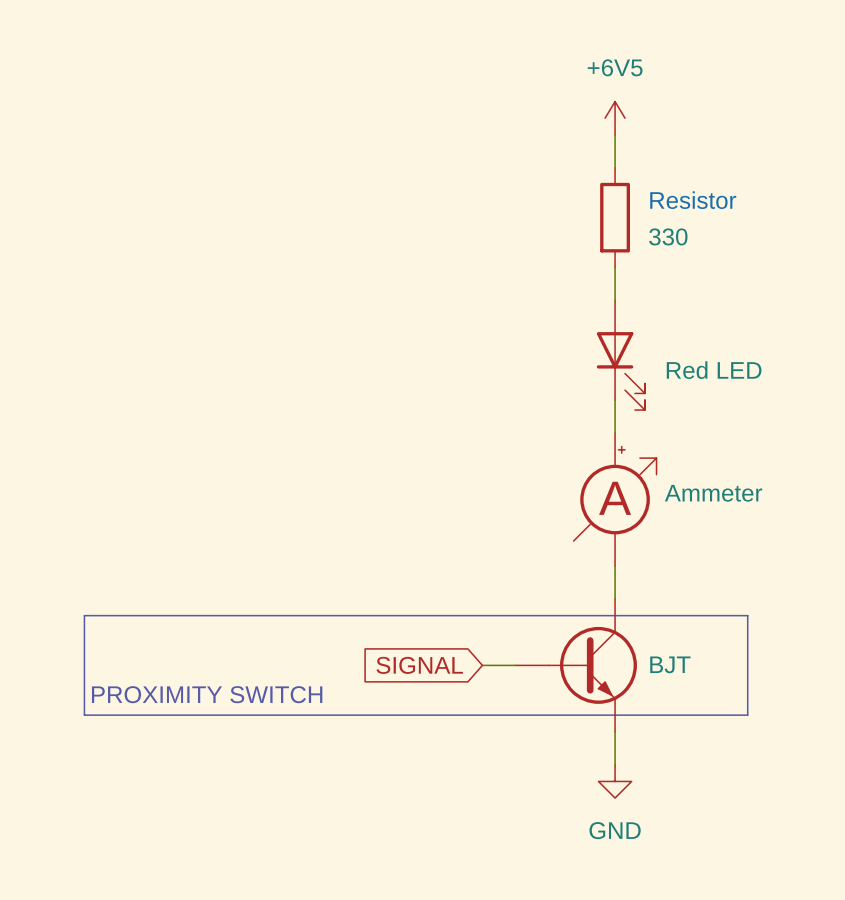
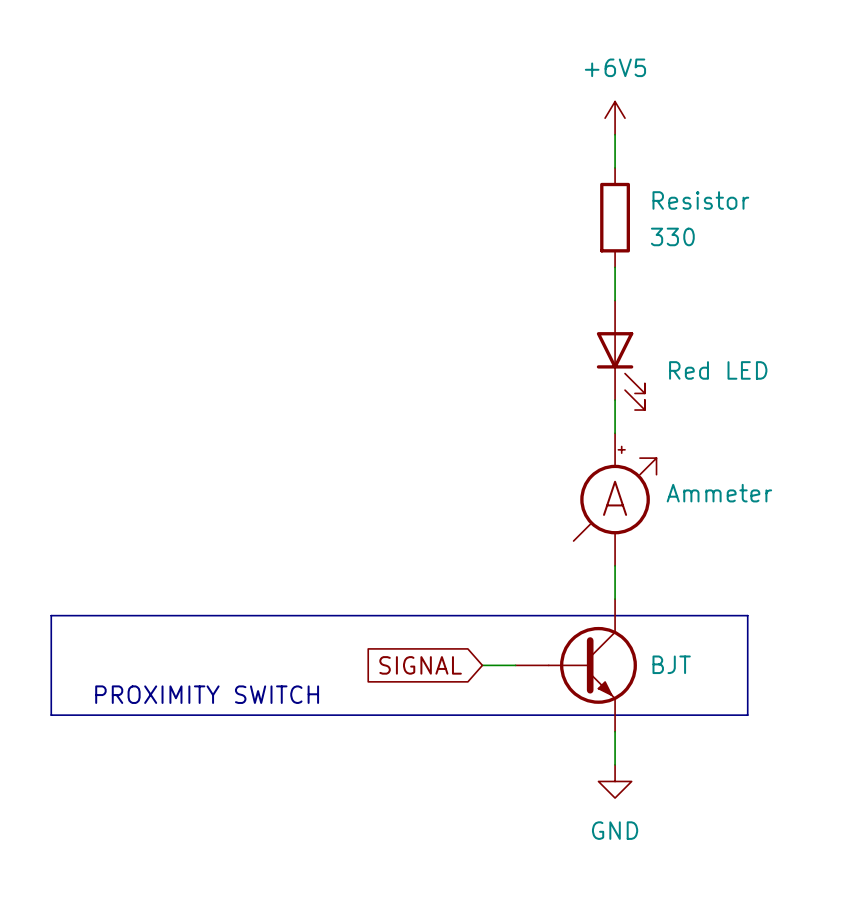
line: (84, 615) (84, 715) -> (84, 615) (51, 615) (51, 715) (84, 715)

